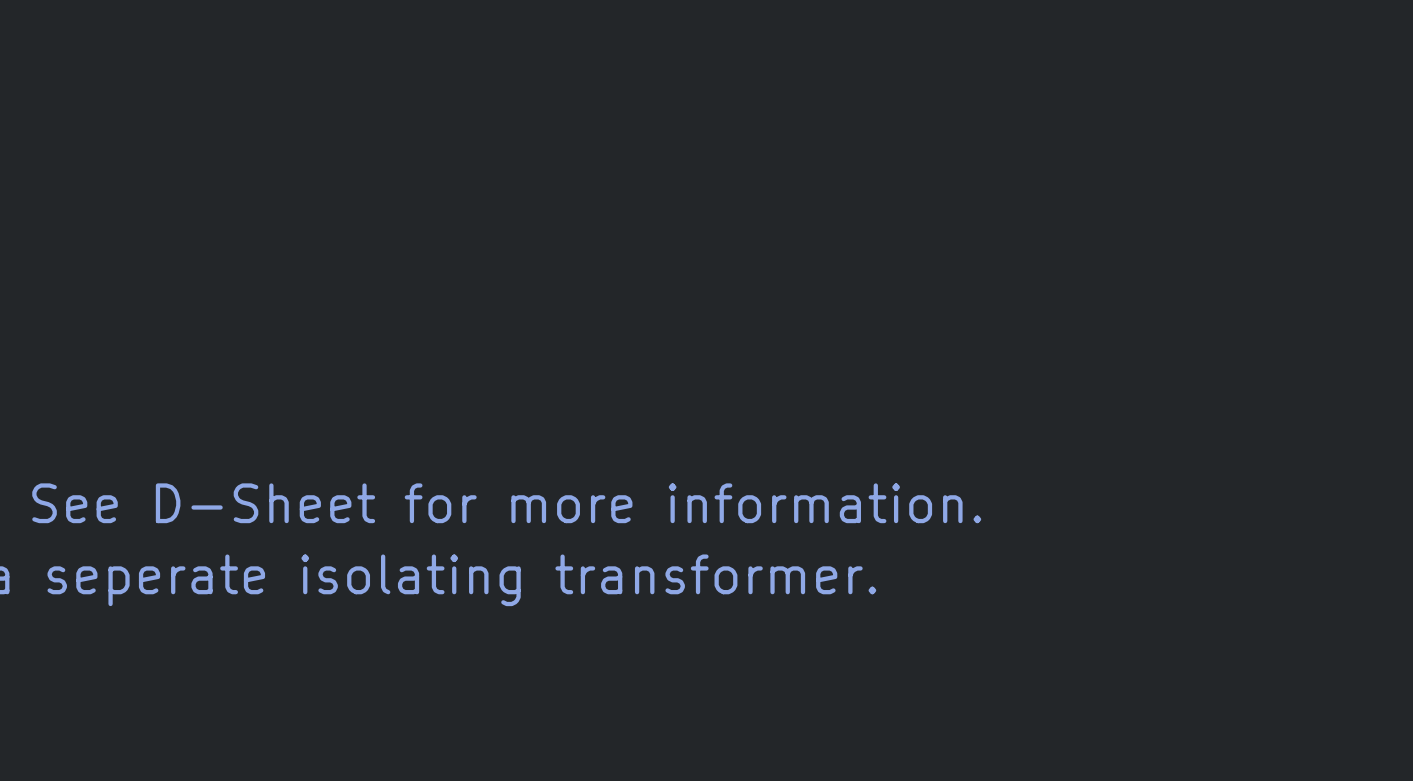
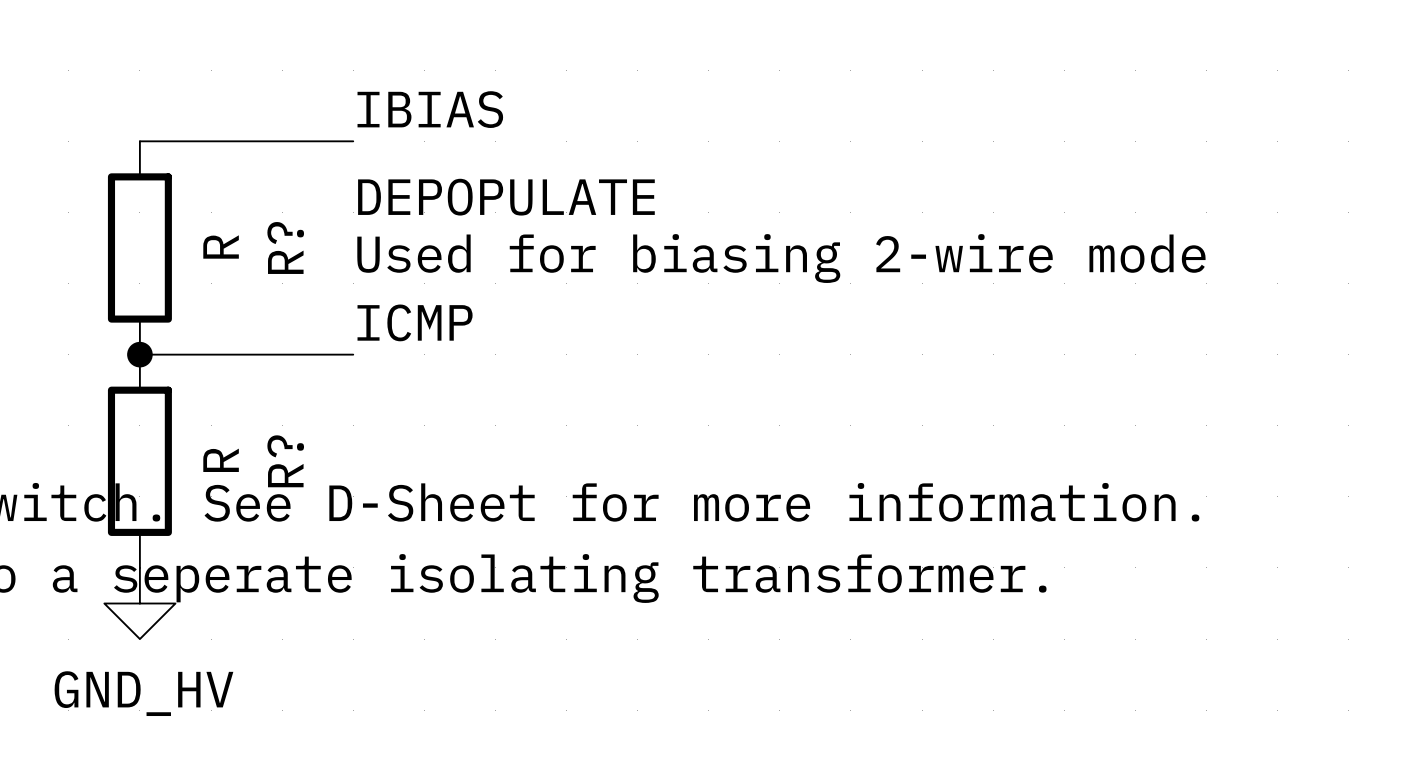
label: none -> IBIAS (430, 109)
wire: none -> (139, 141) (353, 141)
text: none -> DEPOPULATE (506, 197)
R?: none -> R (139, 247)
text: none -> Used for biasing 2-wire mode (781, 258)
label: none -> ICMP (415, 322)
wire: none -> (139, 354) (353, 354)
junction: none -> (139, 354)
R?: none -> R (139, 461)
power symbol: none -> GND_HV (139, 603)

